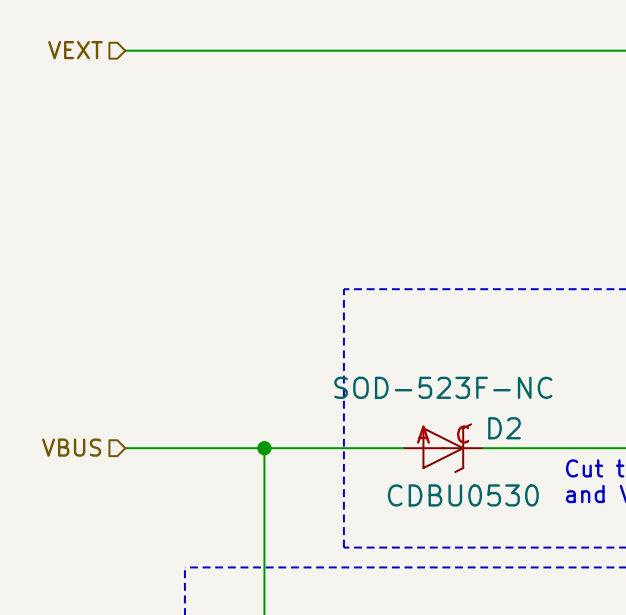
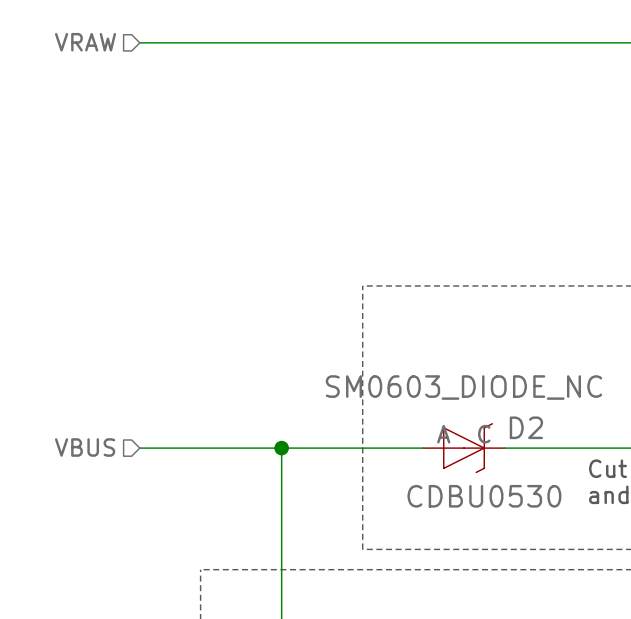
hierarchical label: VEXT (75, 50) -> VRAW (85, 42)
D2 text: SOD-523F-NC (443, 387) -> SM0603_DIODE_NC (464, 387)

